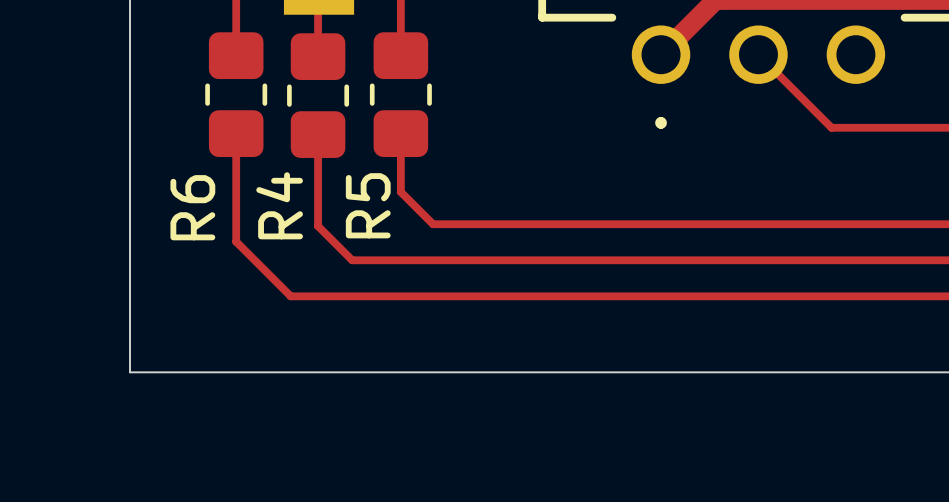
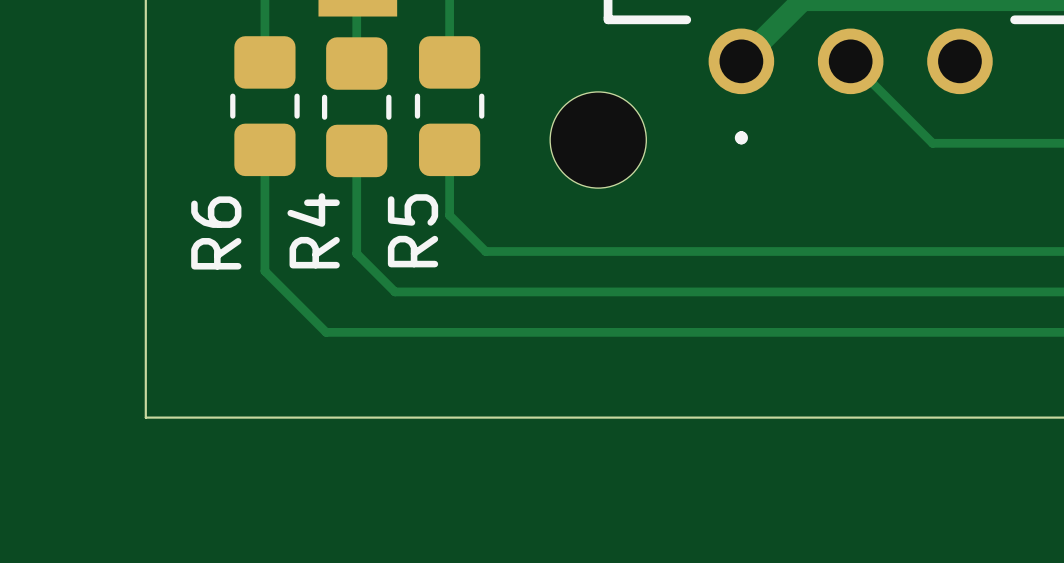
part: none -> (598, 140)

